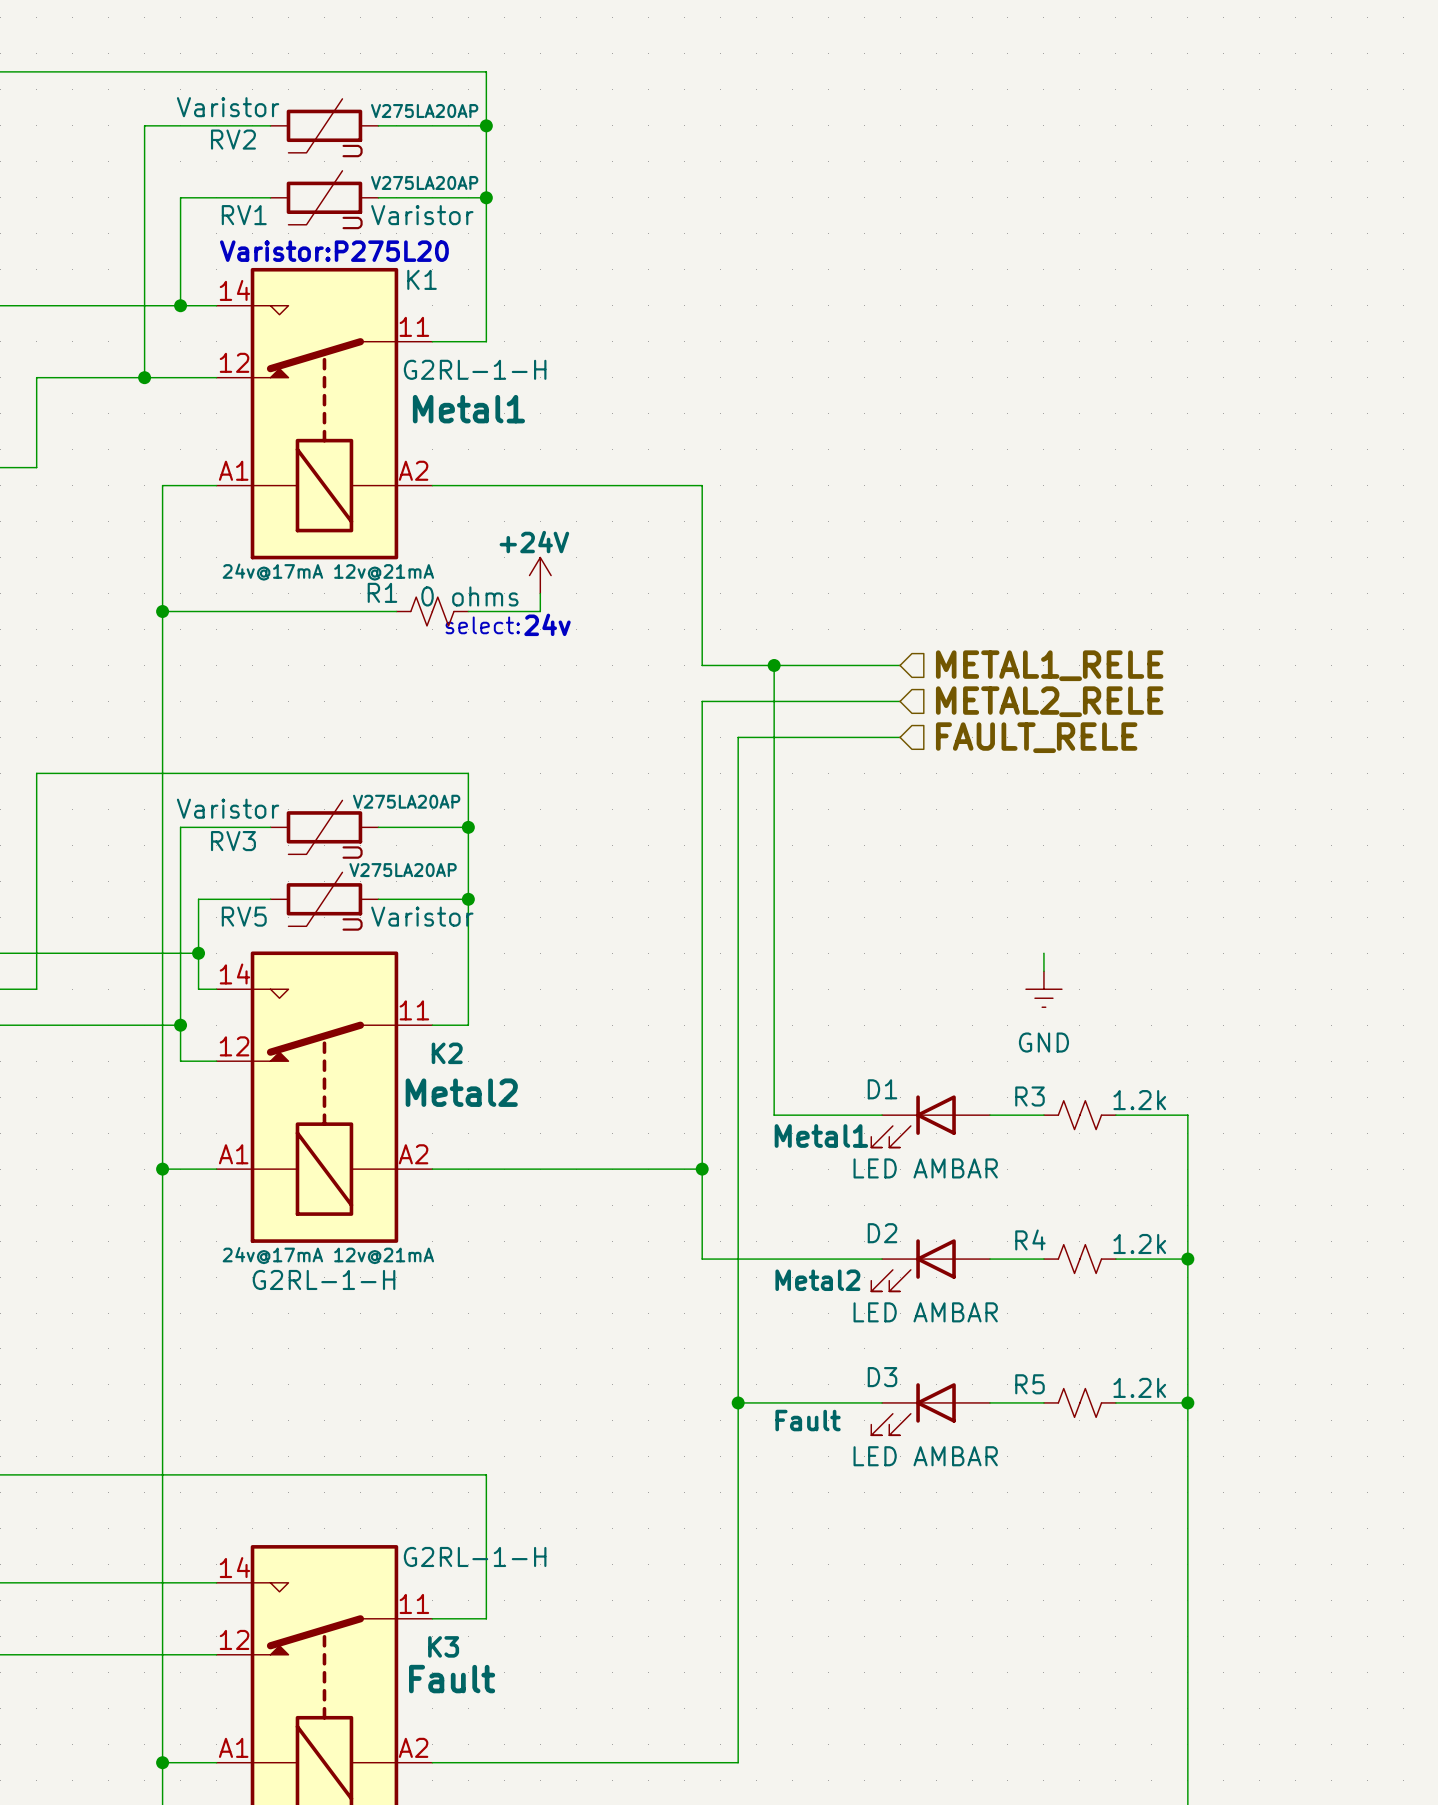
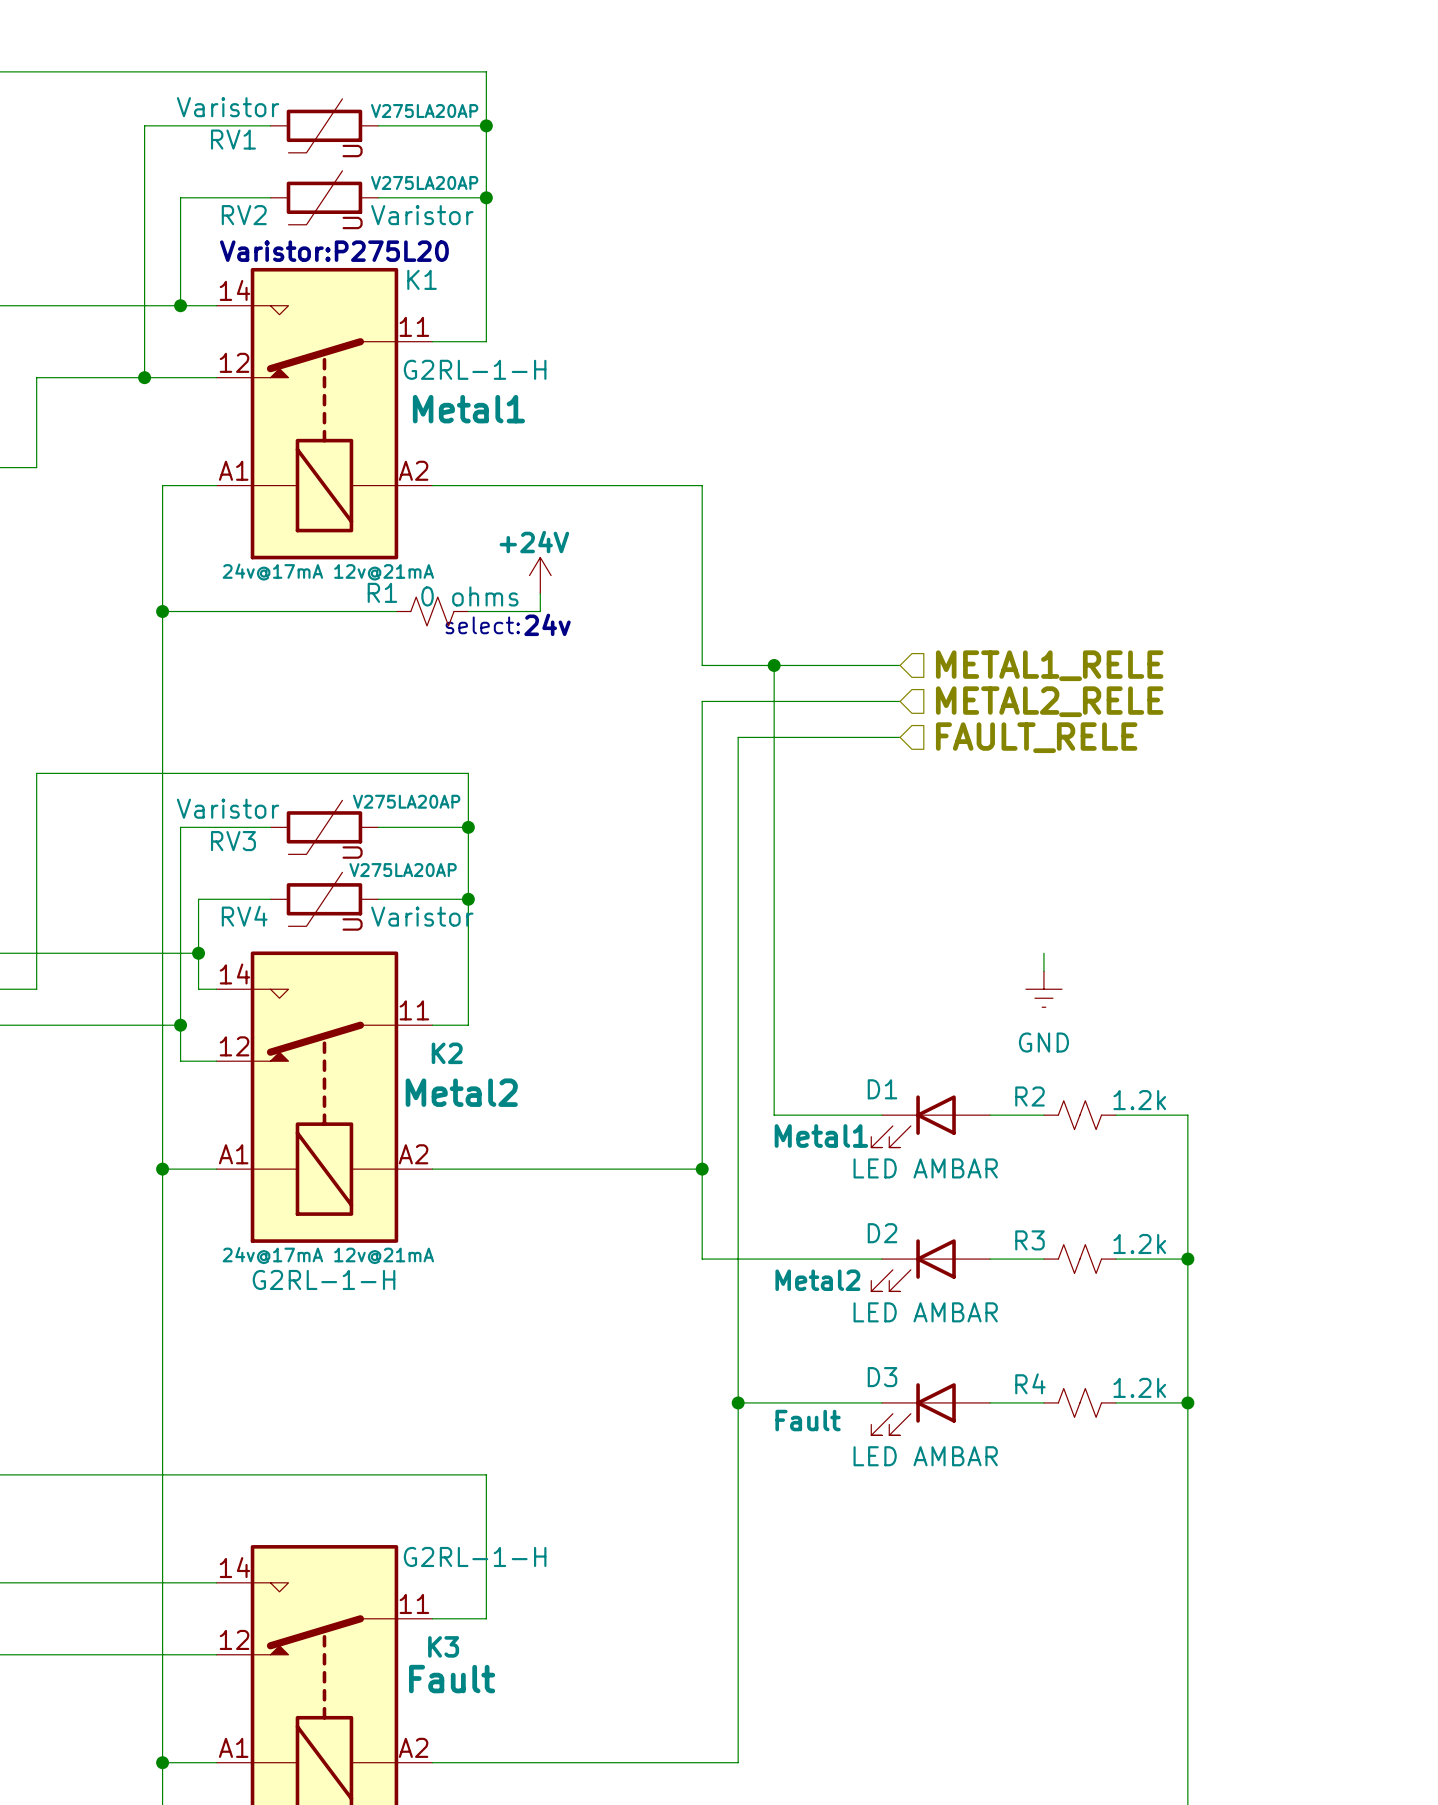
RV2 name: RV2 (233, 139) -> RV1 (233, 139)
RV1 name: RV1 (244, 215) -> RV2 (244, 215)
RV5 name: RV5 (244, 916) -> RV4 (244, 916)
R3 name: R3 (1030, 1096) -> R2 (1030, 1096)
R4 name: R4 (1030, 1239) -> R3 (1030, 1240)
R5 name: R5 (1030, 1384) -> R4 (1030, 1383)

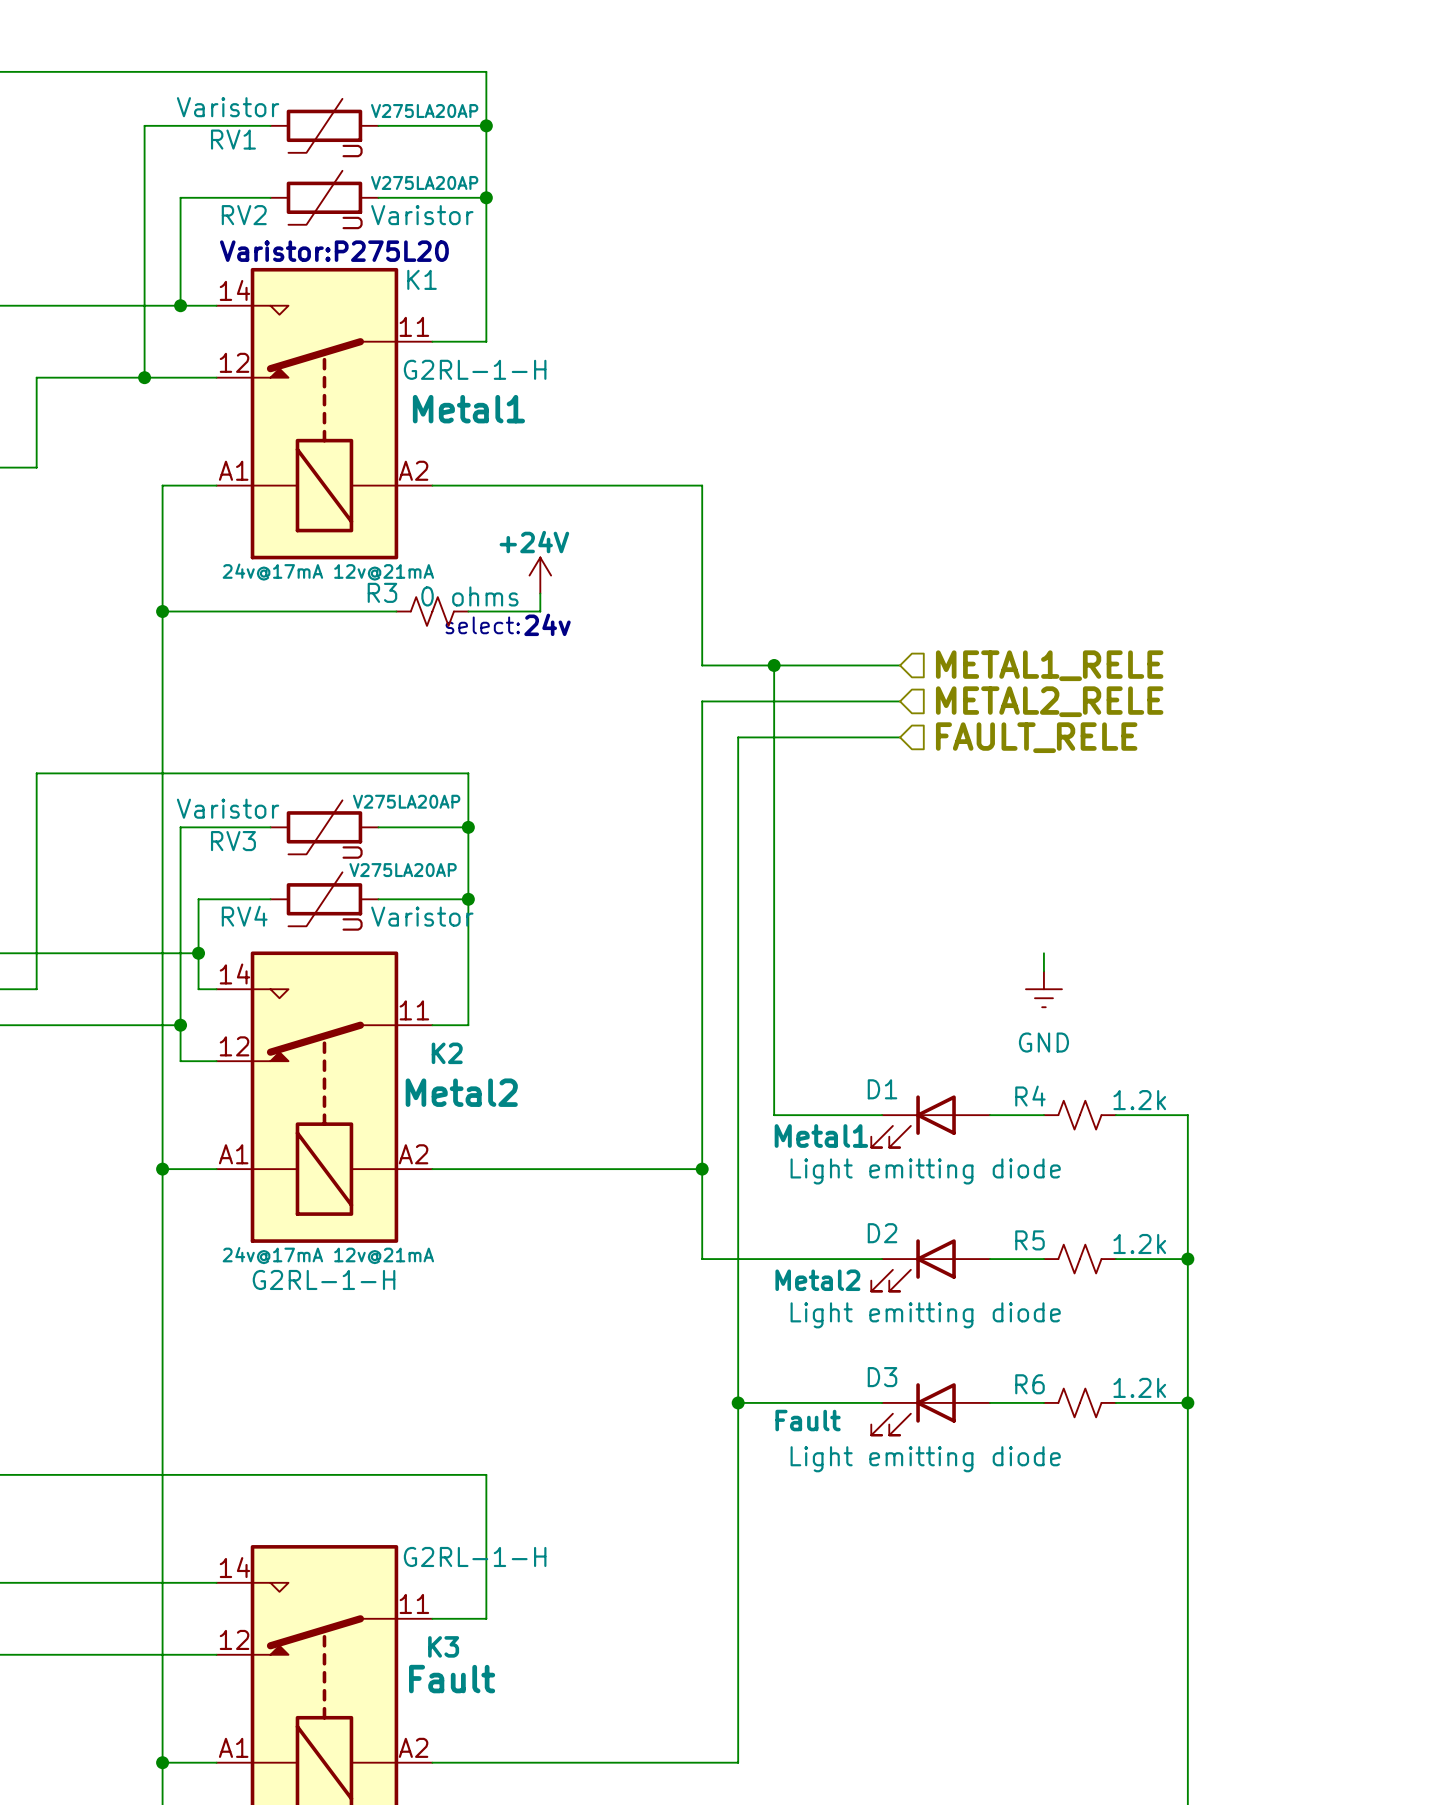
R1 name: R1 (382, 592) -> R3 (382, 592)
R2 name: R2 (1030, 1096) -> R4 (1030, 1096)
D1 text: LED AMBAR (925, 1168) -> Light emitting diode (925, 1171)
R3 name: R3 (1030, 1240) -> R5 (1030, 1240)
D2 text: LED AMBAR (925, 1312) -> Light emitting diode (925, 1315)
R4 name: R4 (1030, 1383) -> R6 (1030, 1384)
D3 text: LED AMBAR (925, 1456) -> Light emitting diode (925, 1459)

